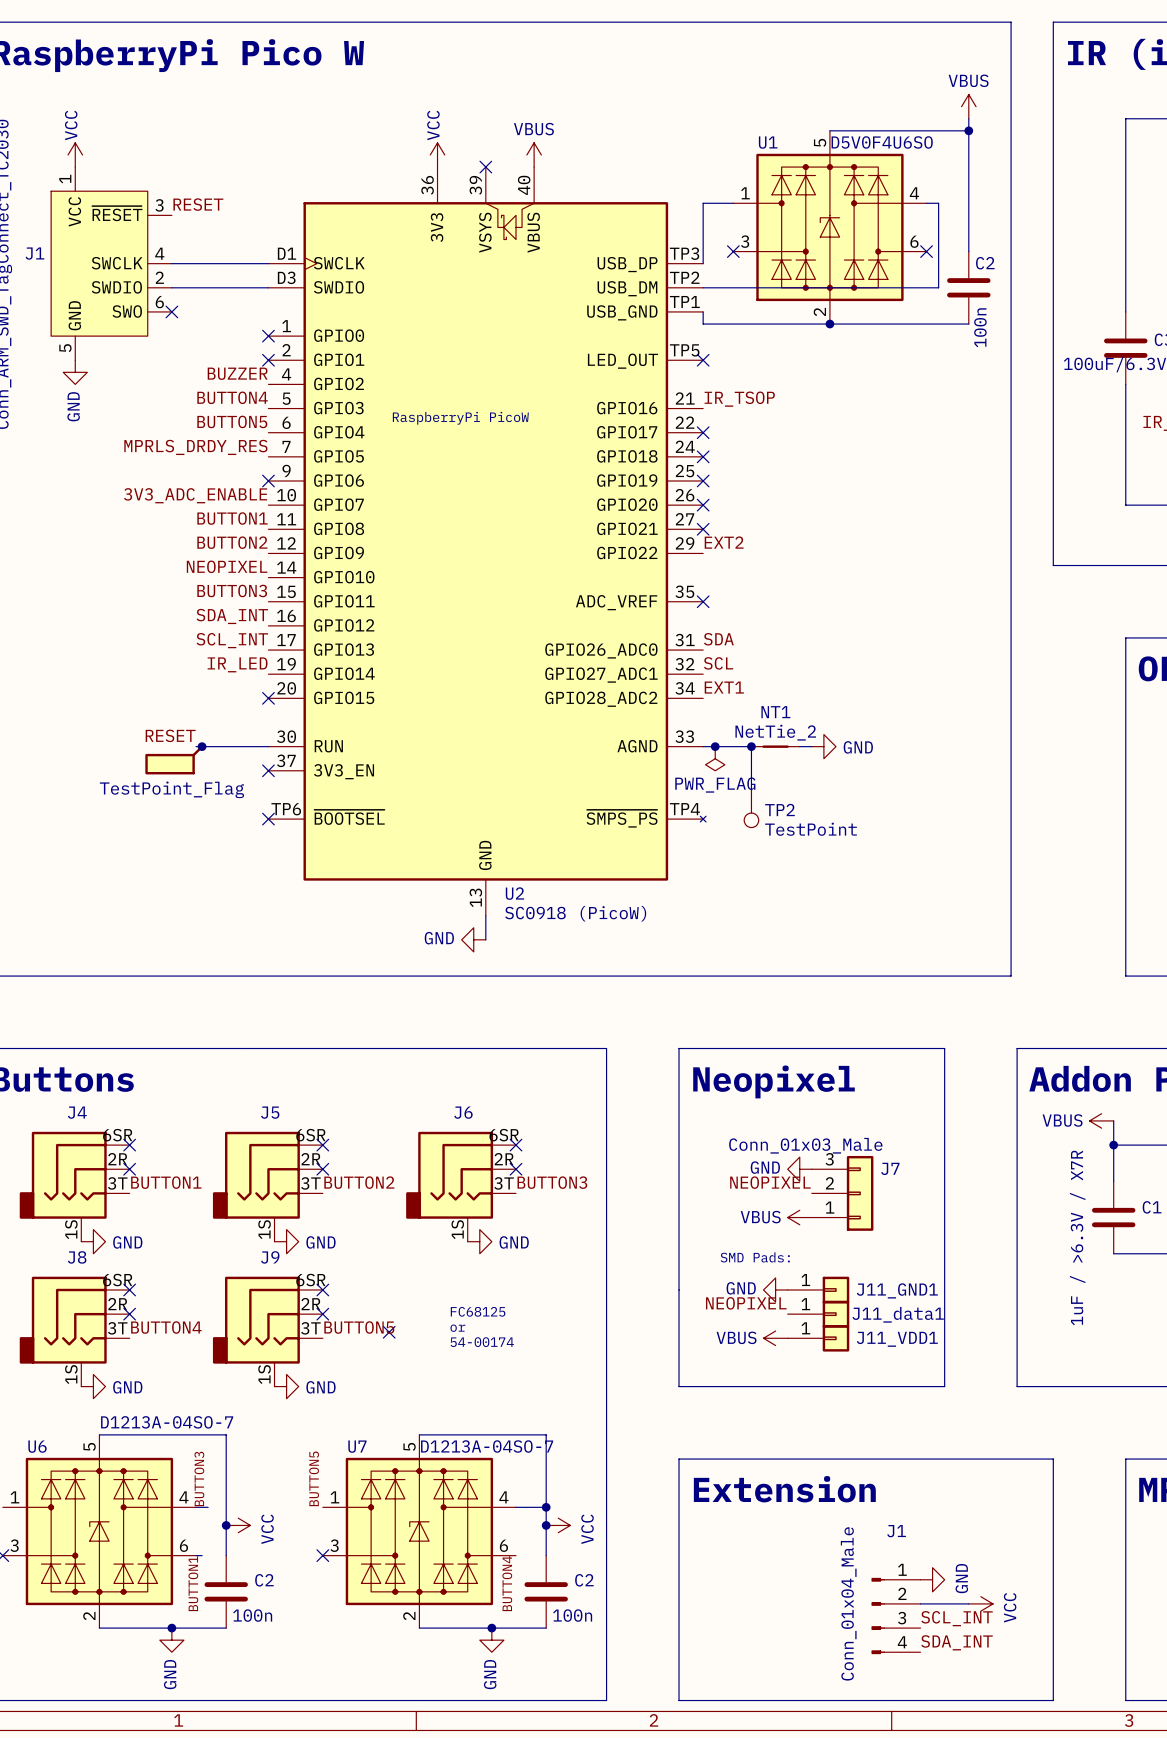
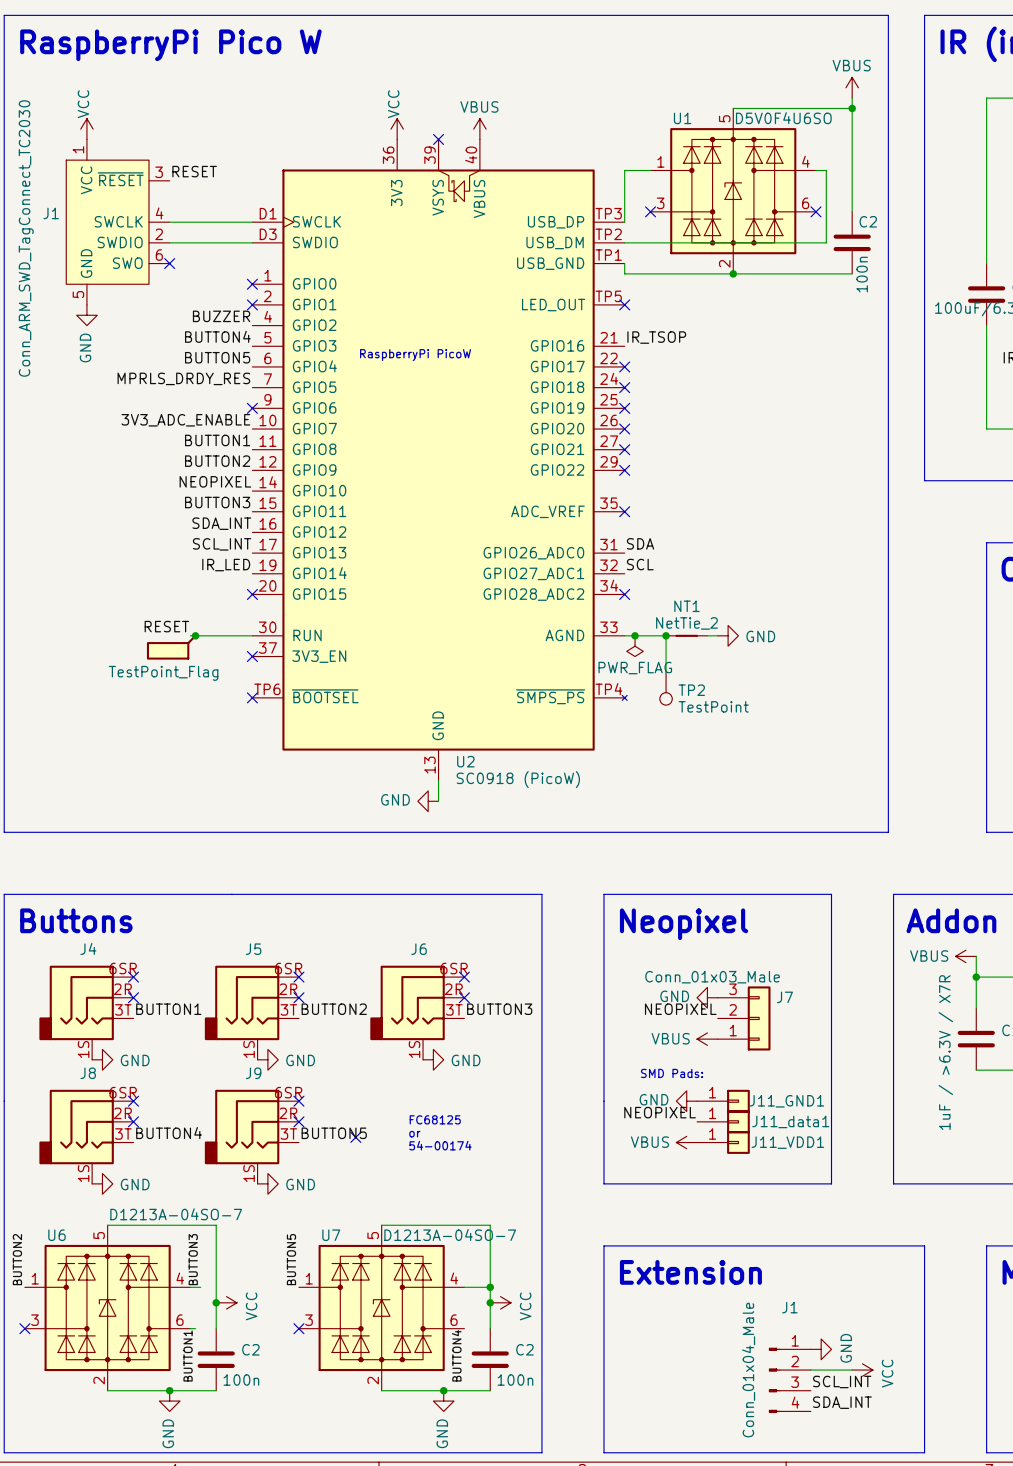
label: EXT2 (724, 542) -> none
no-connect mark: none -> (624, 470)
label: EXT1 (724, 687) -> none
no-connect mark: none -> (624, 594)

